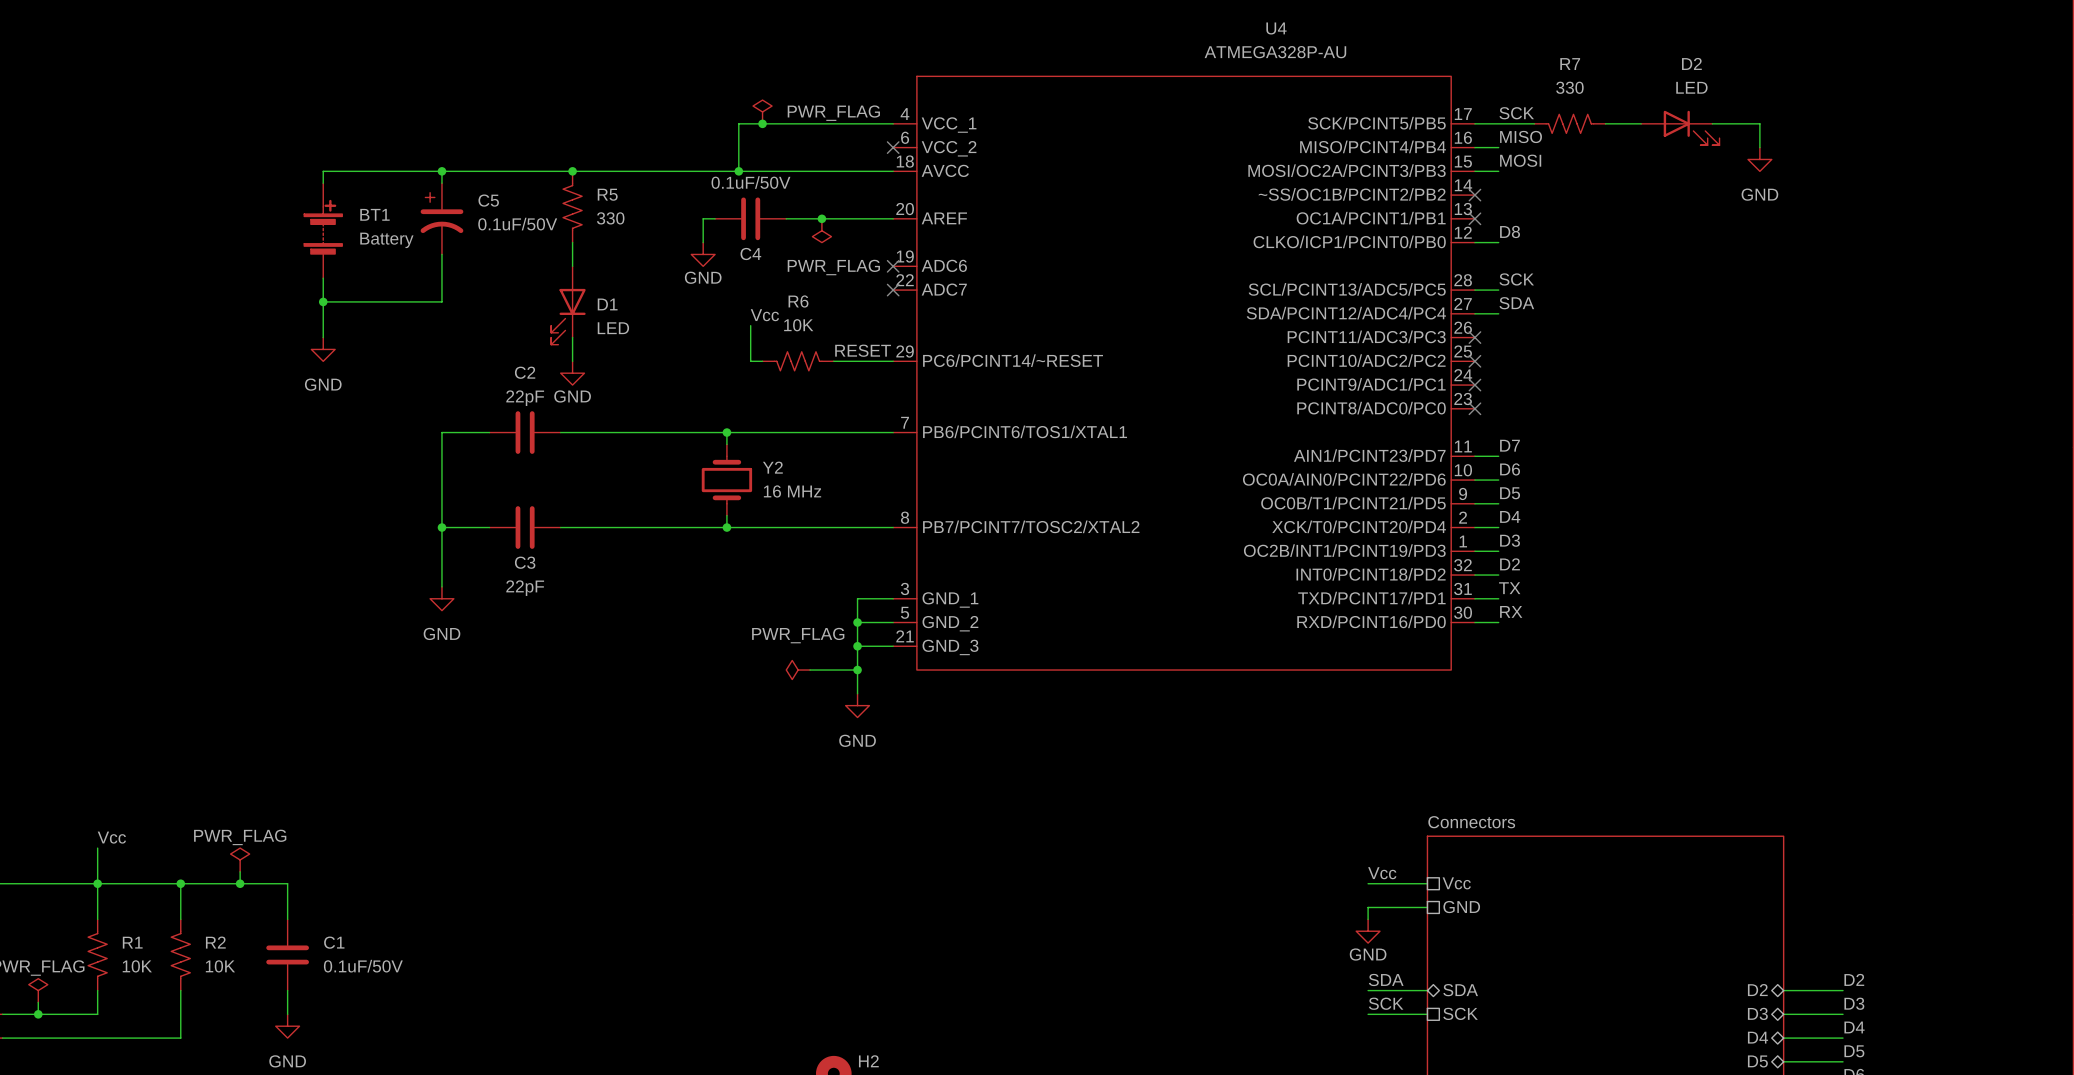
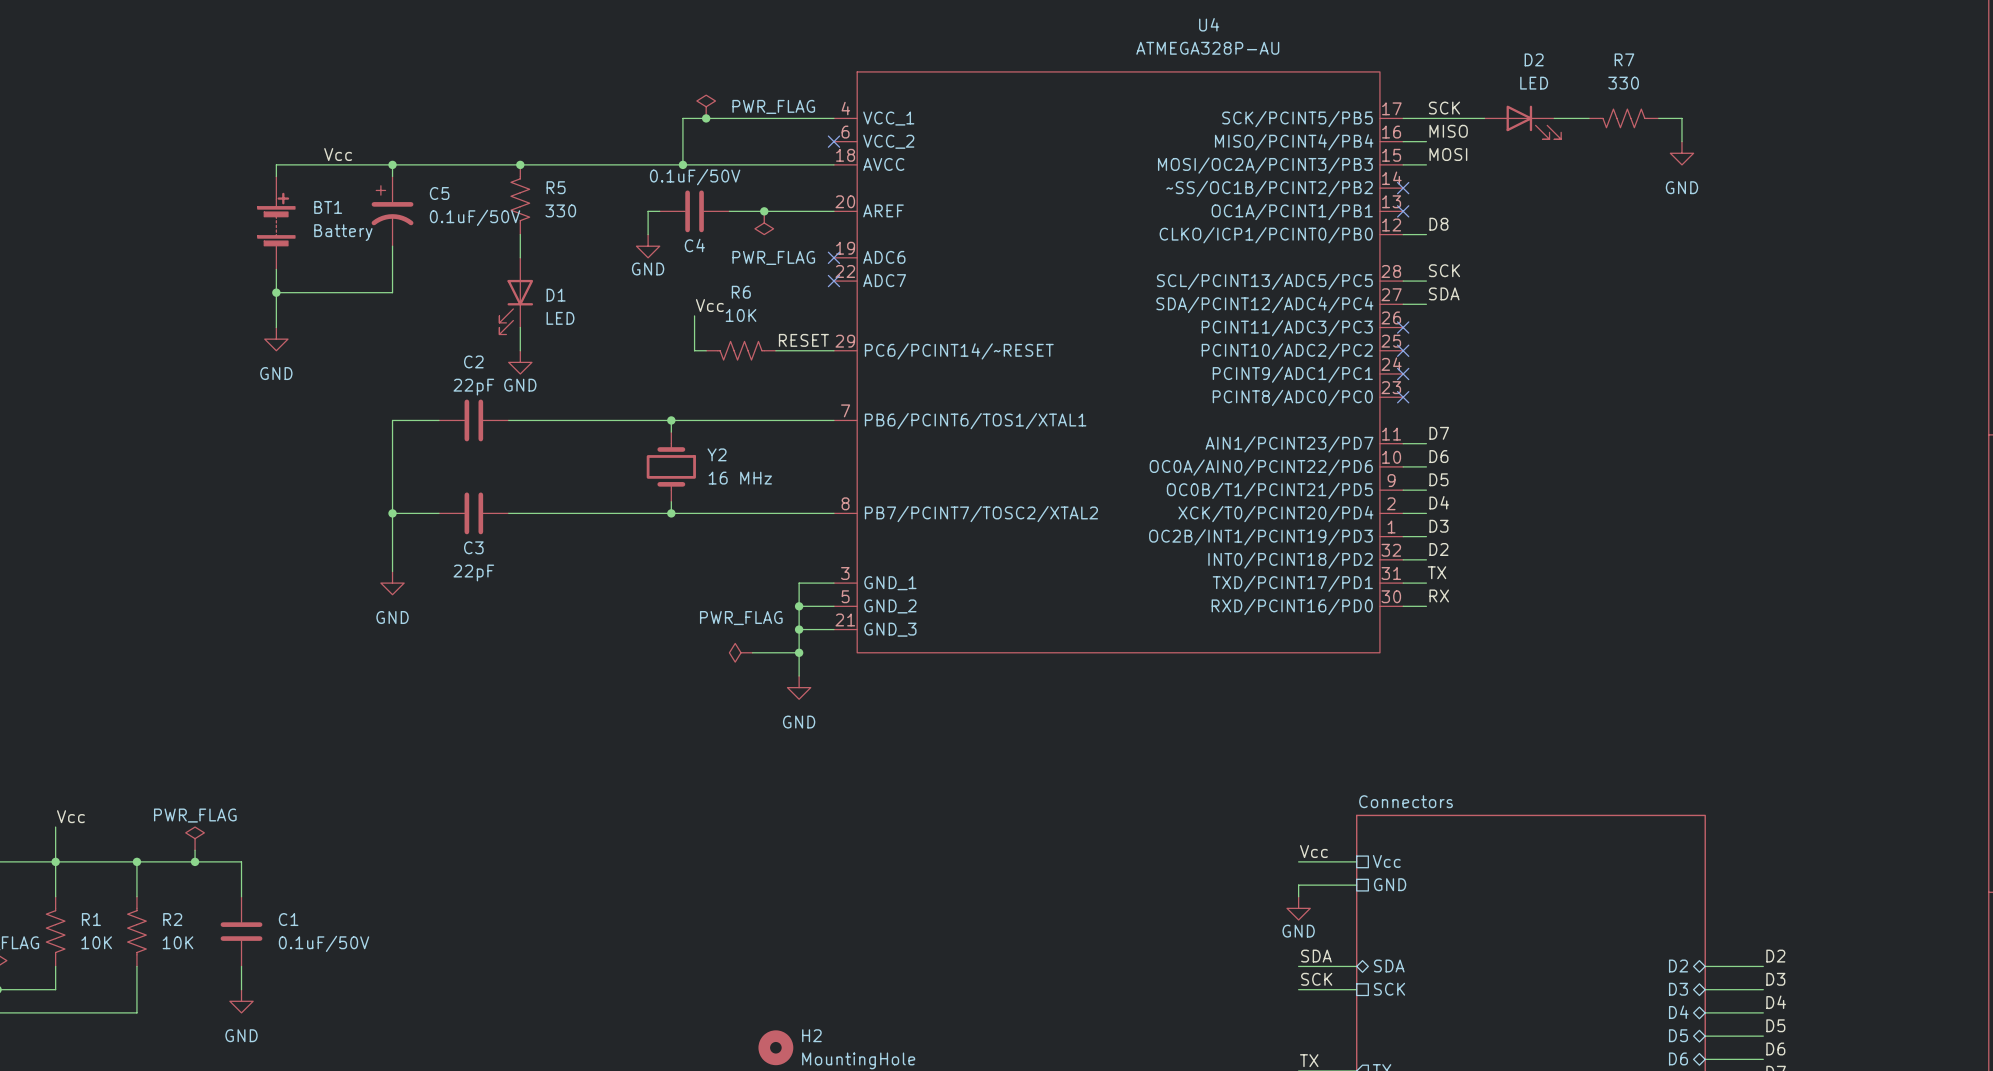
R7 position: (1569, 123) -> (1623, 118)
D2 position: (1680, 128) -> (1522, 122)
label: none -> Vcc (338, 154)

